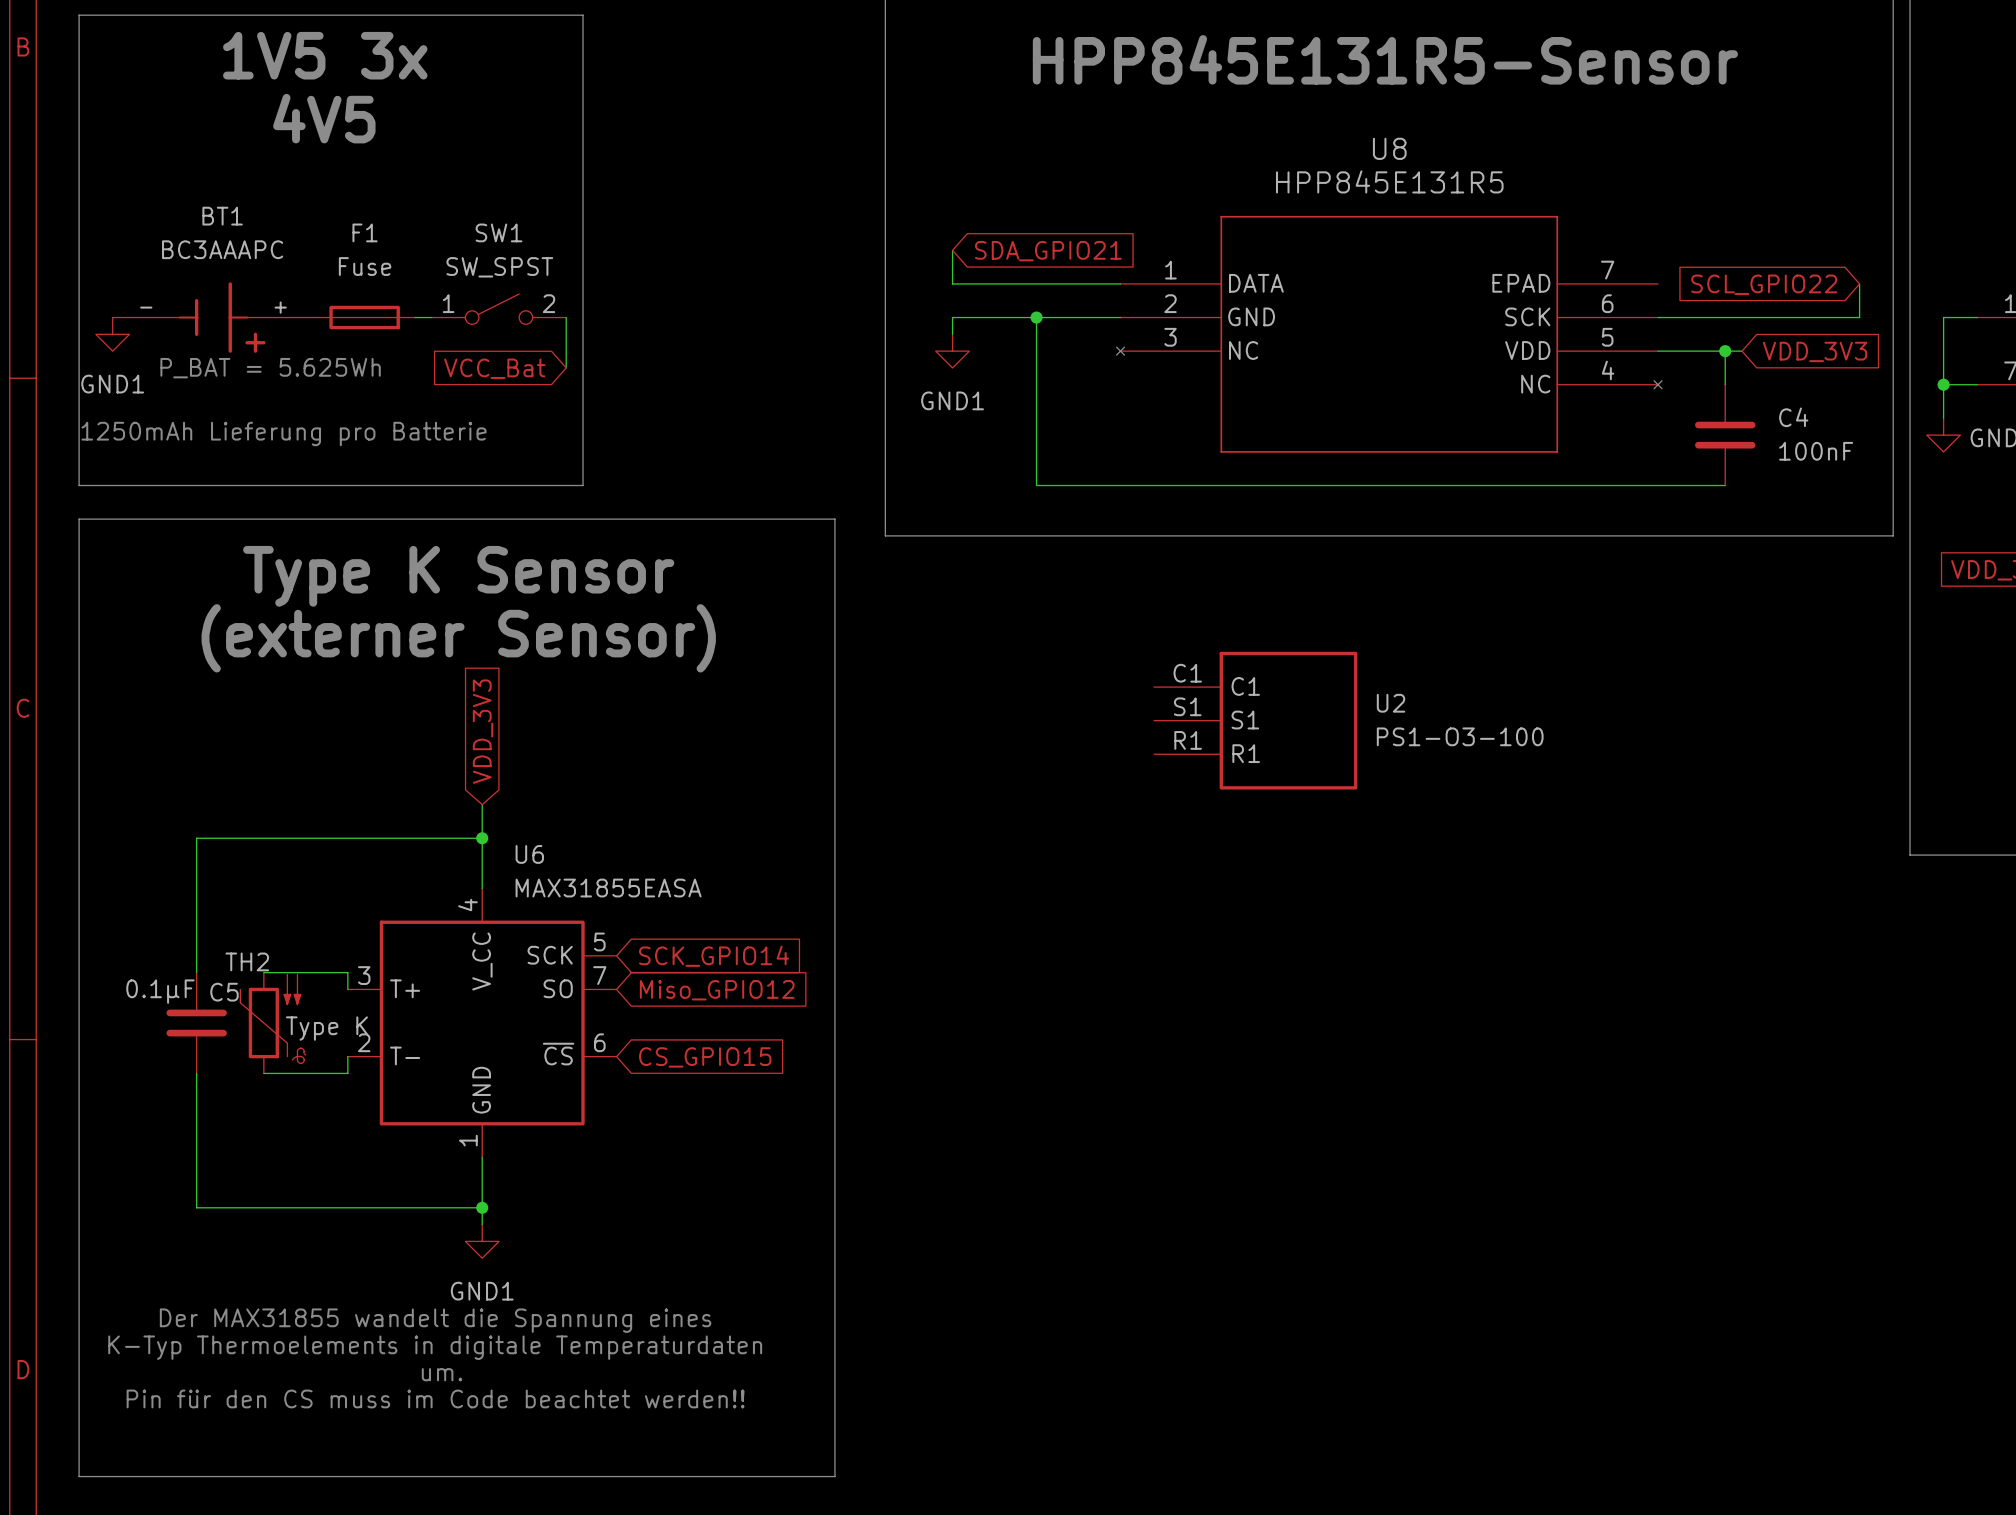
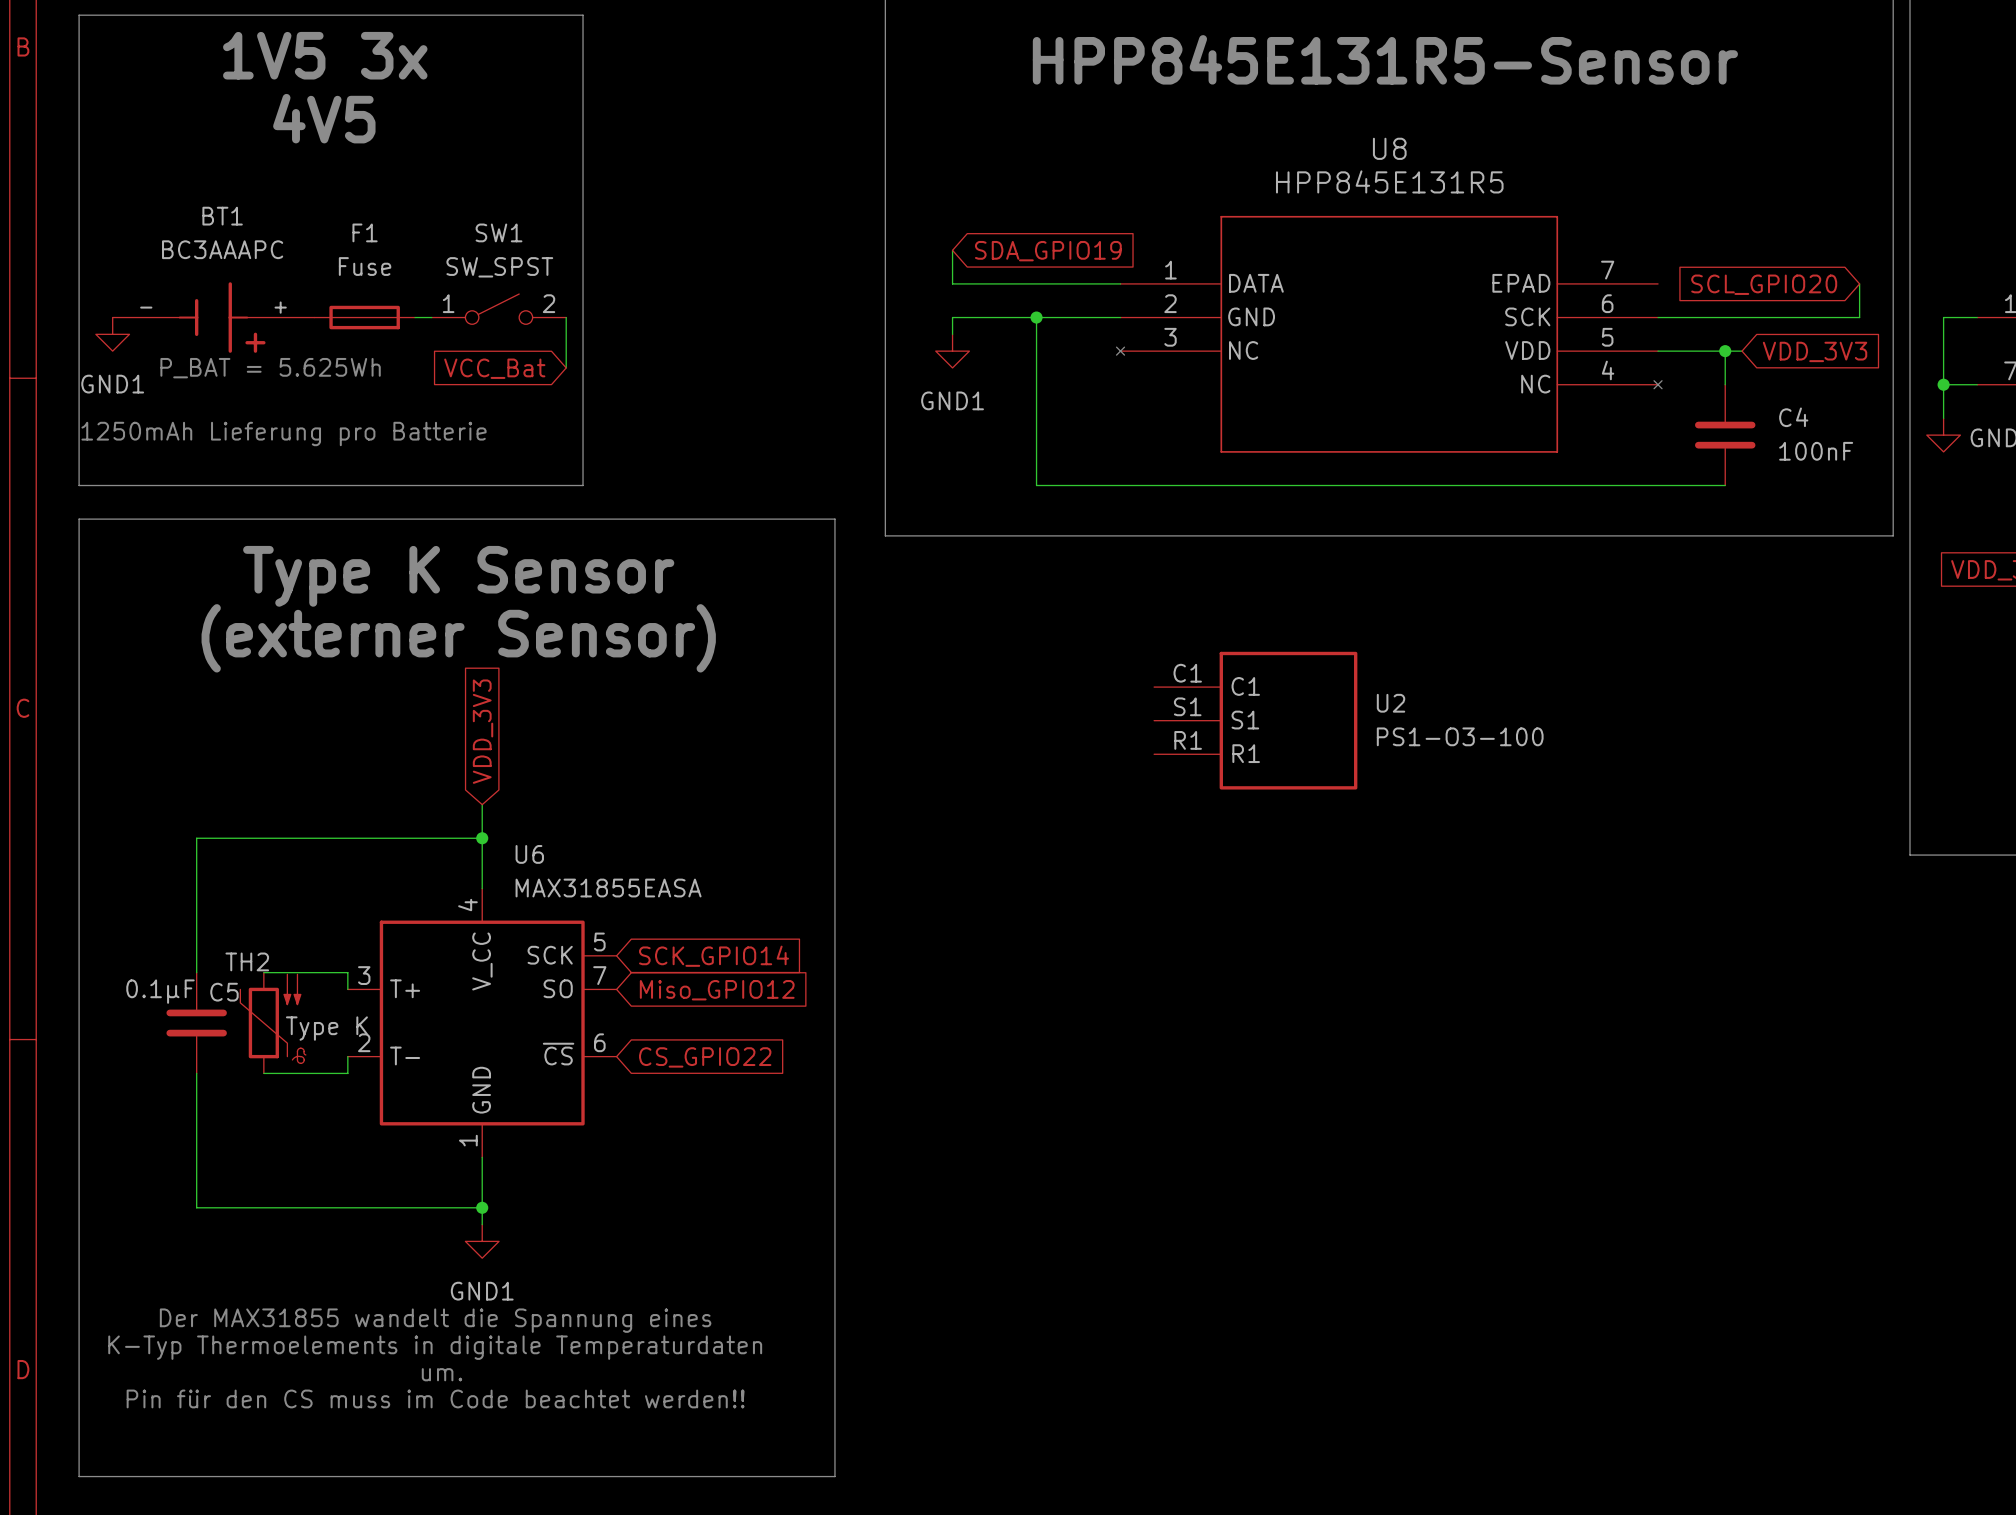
global label: SDA_GPIO21 (1048, 251) -> SDA_GPIO19 (1048, 251)
global label: SCL_GPIO22 (1764, 284) -> SCL_GPIO20 (1764, 284)
global label: CS_GPIO15 (705, 1057) -> CS_GPIO22 (705, 1057)

